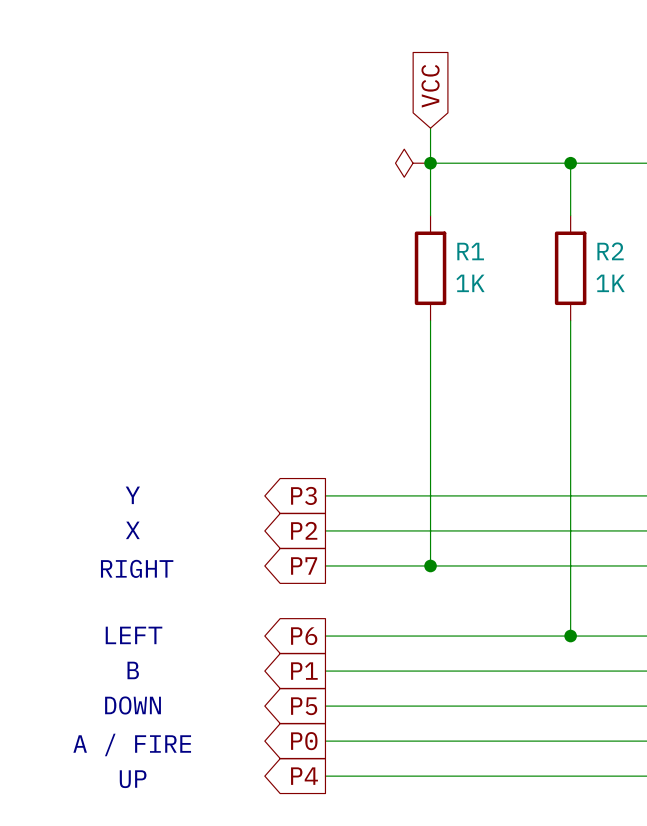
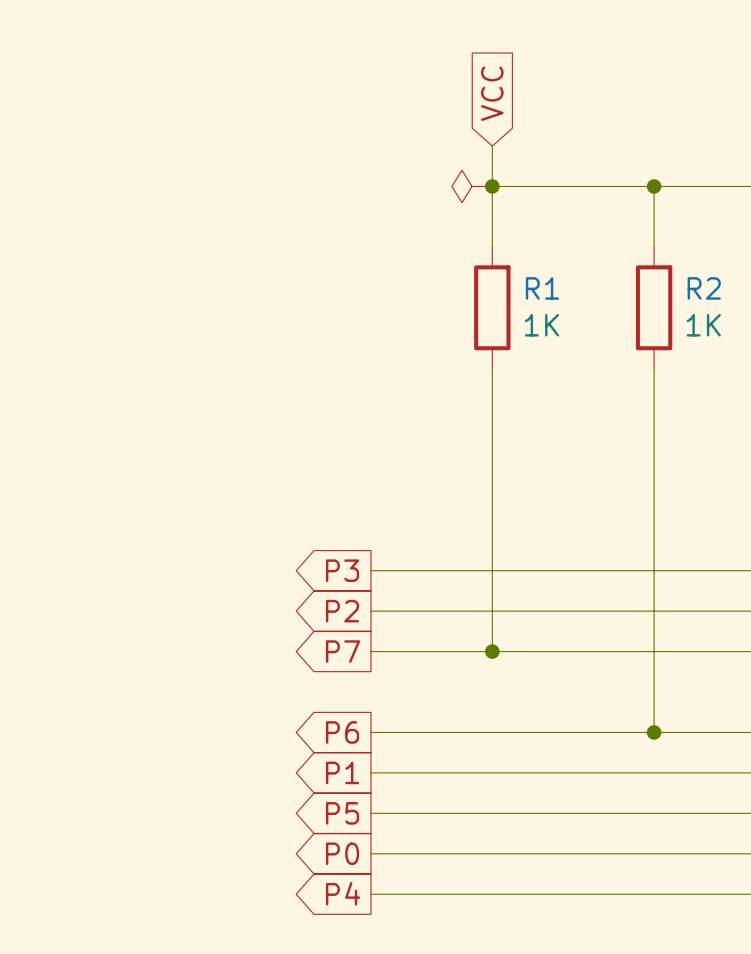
text: Y (132, 495) -> none
text: X (132, 530) -> none
text: RIGHT (137, 568) -> none
text: LEFT (134, 635) -> none
text: B (133, 670) -> none
text: DOWN (133, 705) -> none
text: A / FIRE (132, 744) -> none
text: UP (133, 779) -> none

